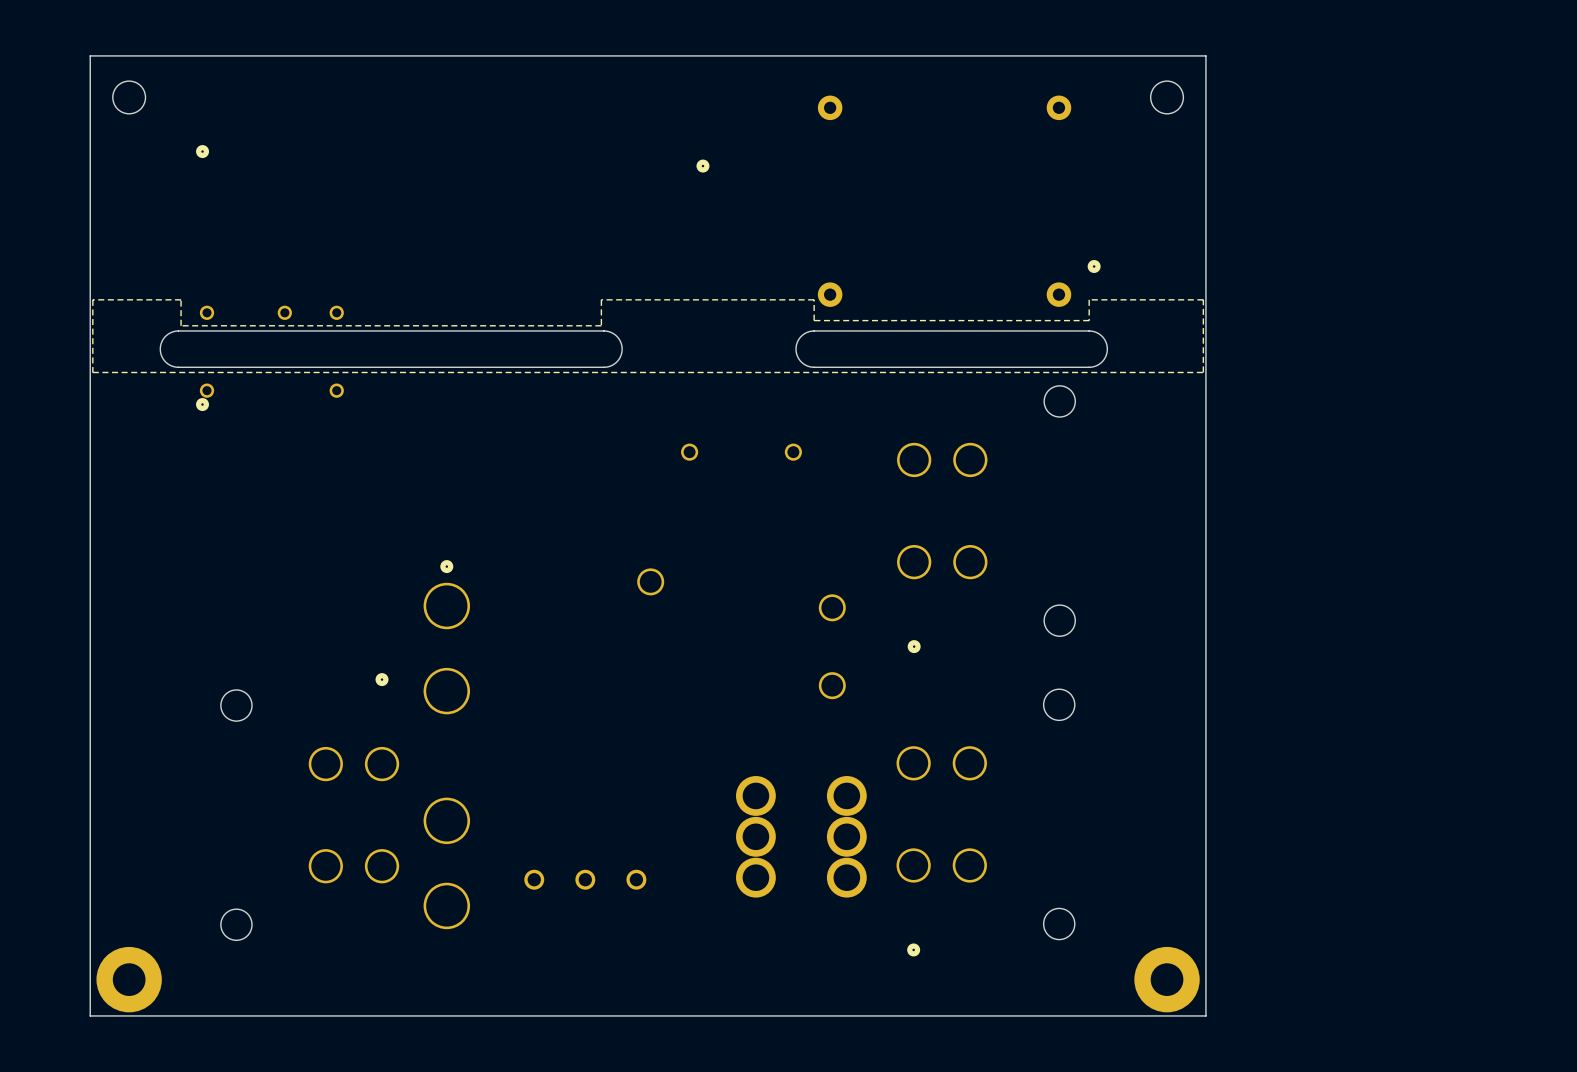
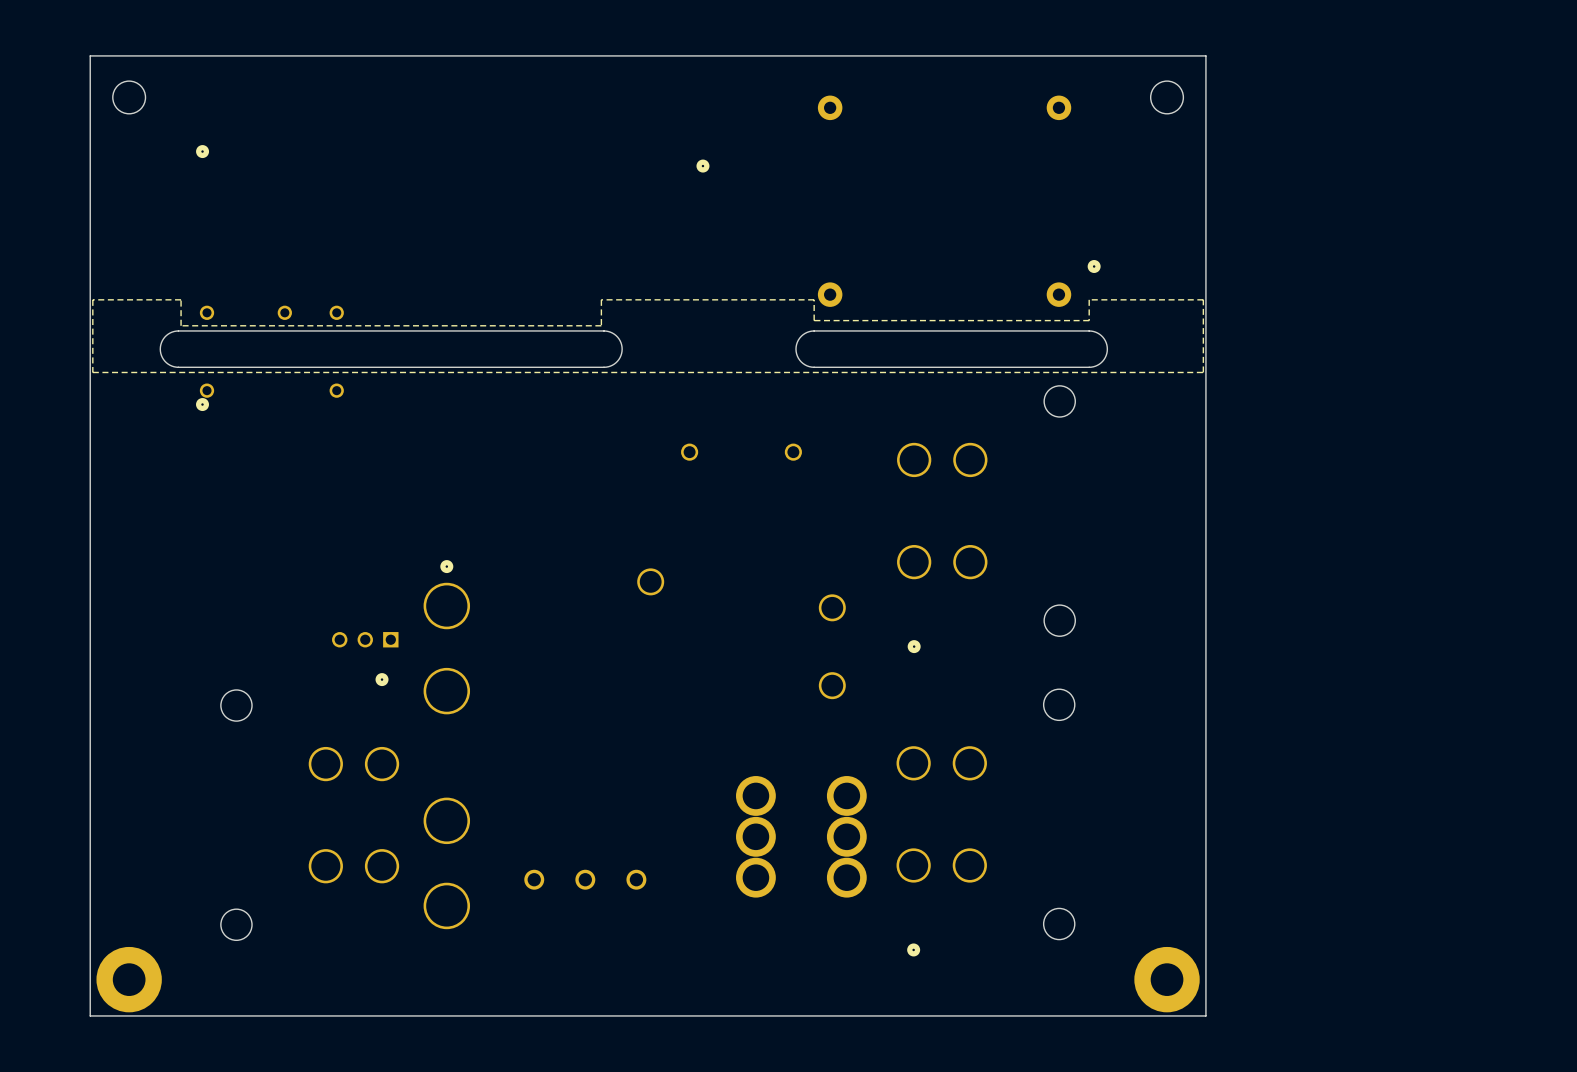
part: none -> (365, 639)

